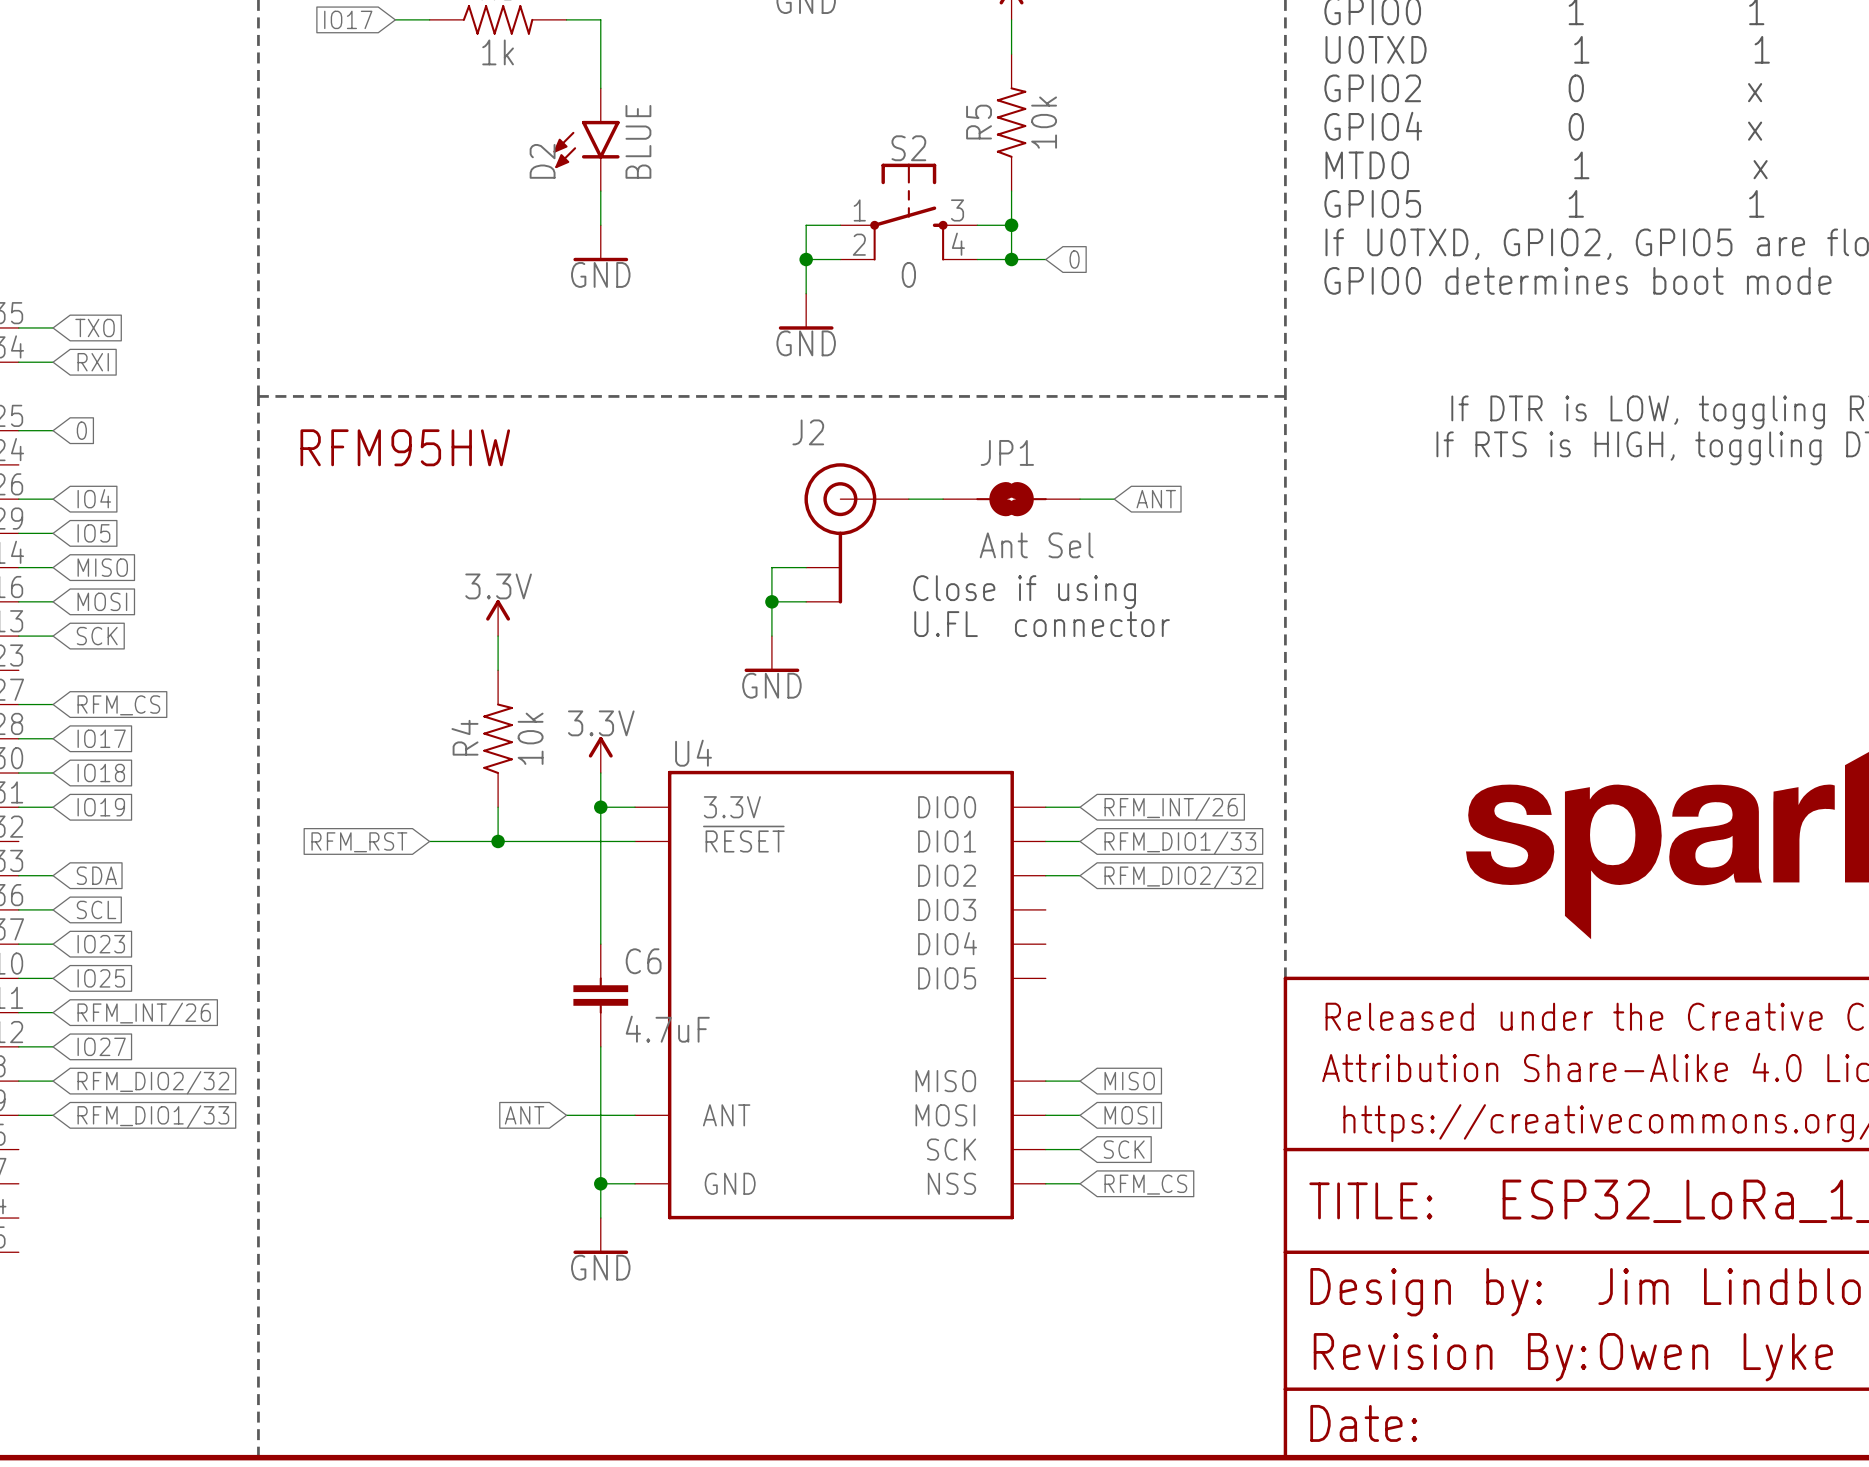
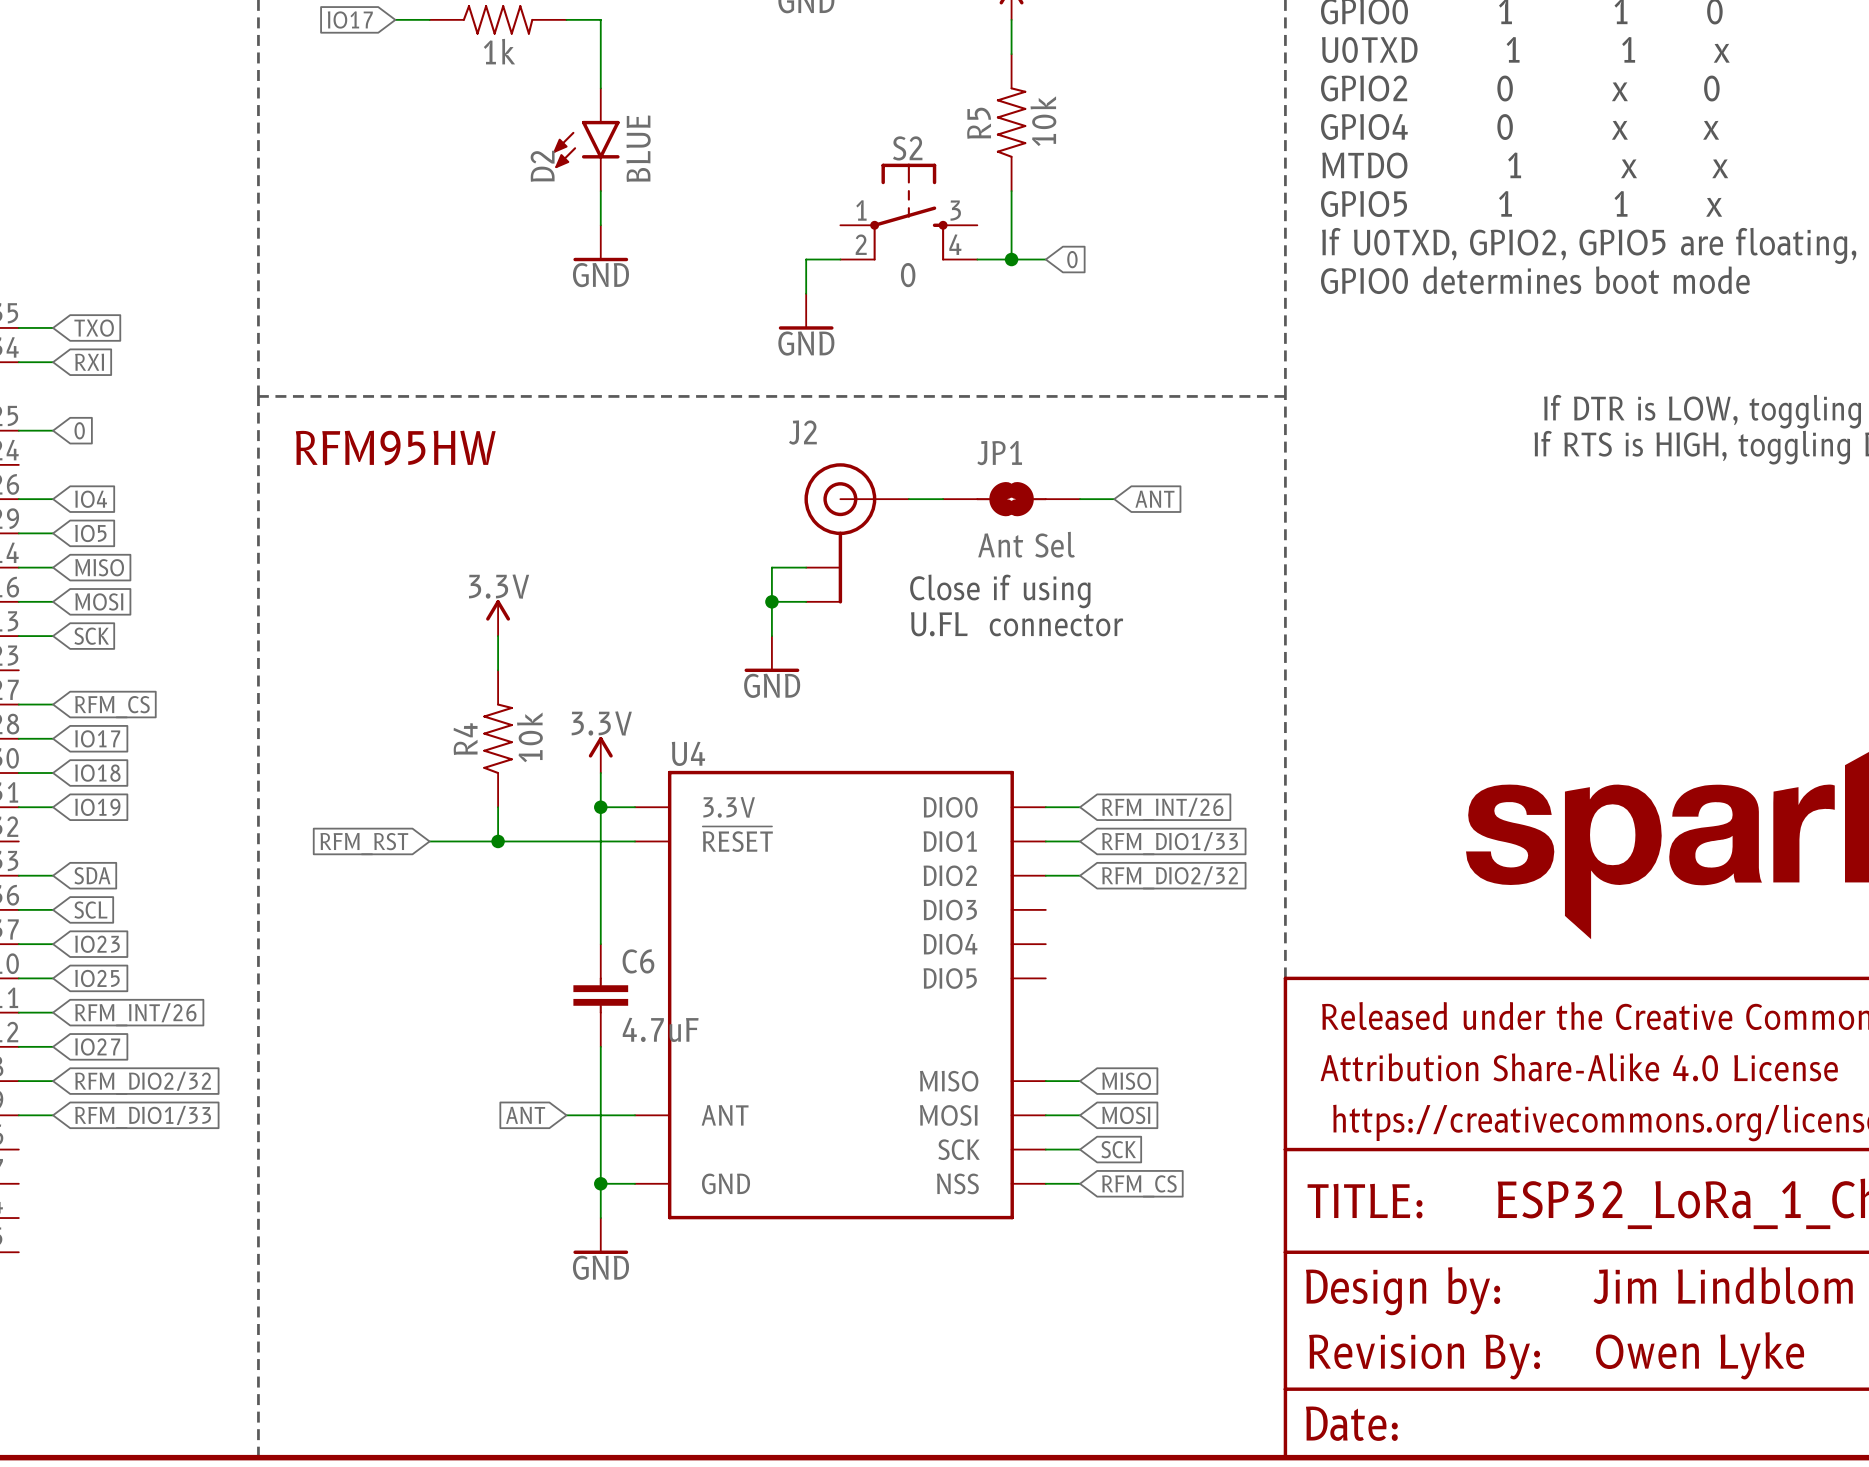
wire: (840, 225) (806, 225) (806, 259) -> none
wire: (977, 225) (1011, 225) -> none
junction: (1011, 225) -> none
junction: (806, 259) -> none

